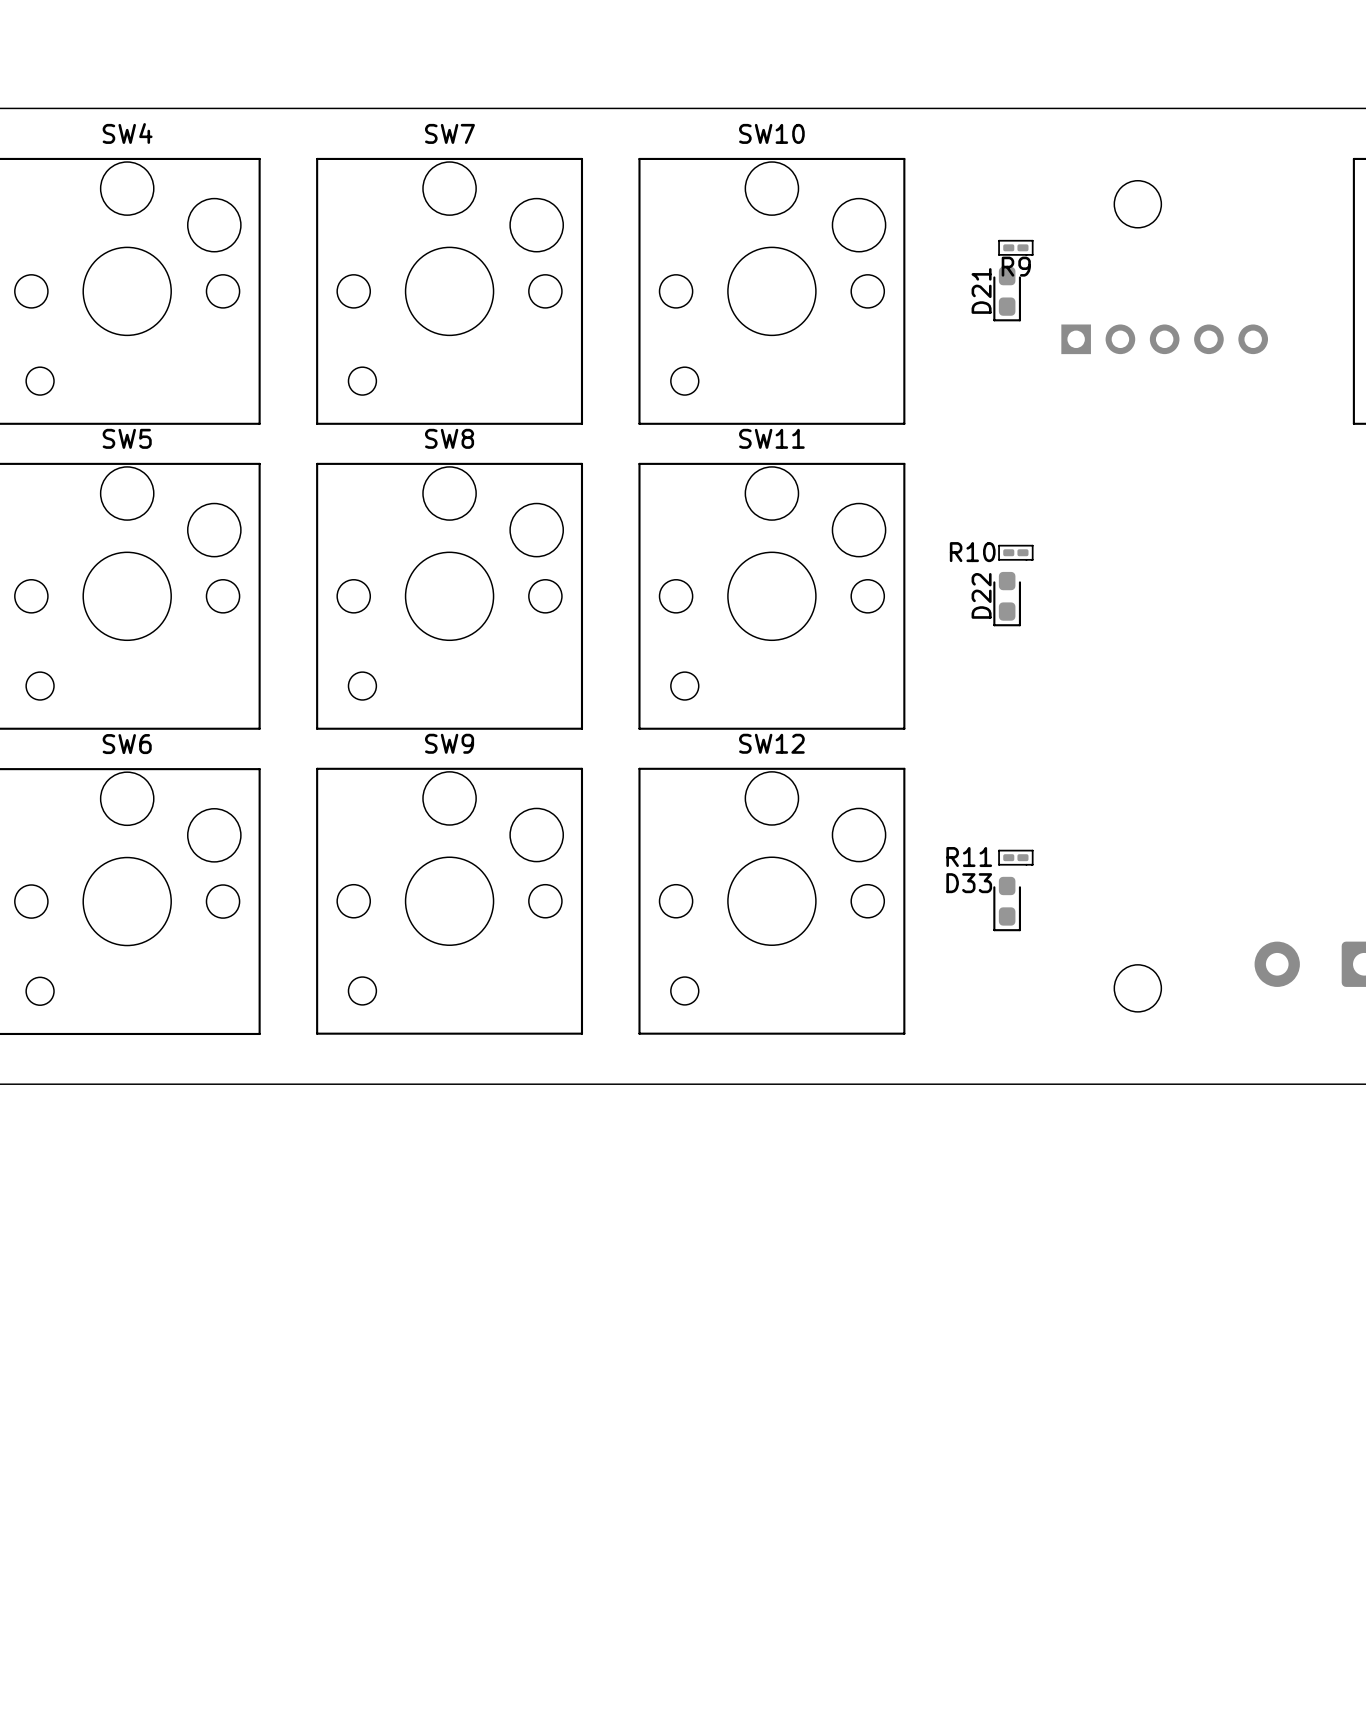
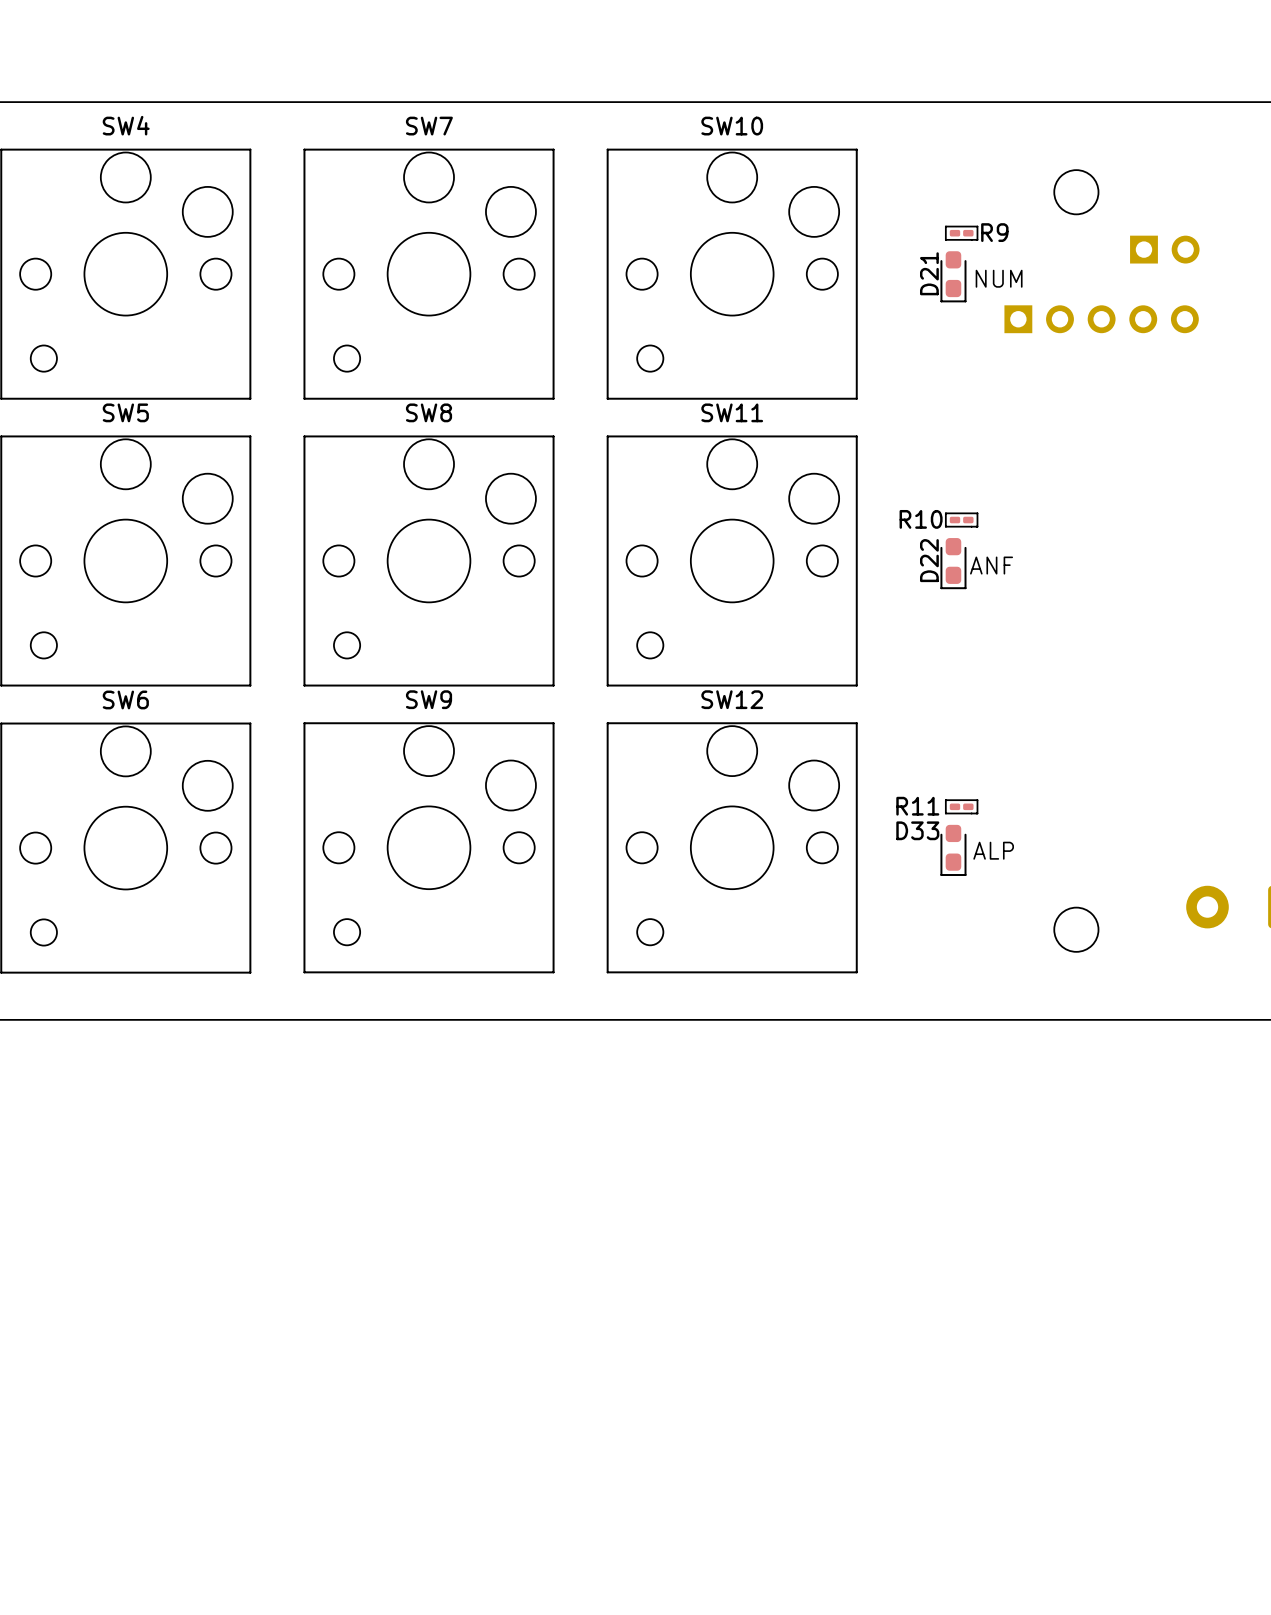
part: none -> (1164, 249)
R9 name position: R9 (1016, 266) -> R9 (994, 232)
text: none -> NUM (999, 278)
text: none -> ANF (991, 565)
text: none -> ALP (993, 850)

